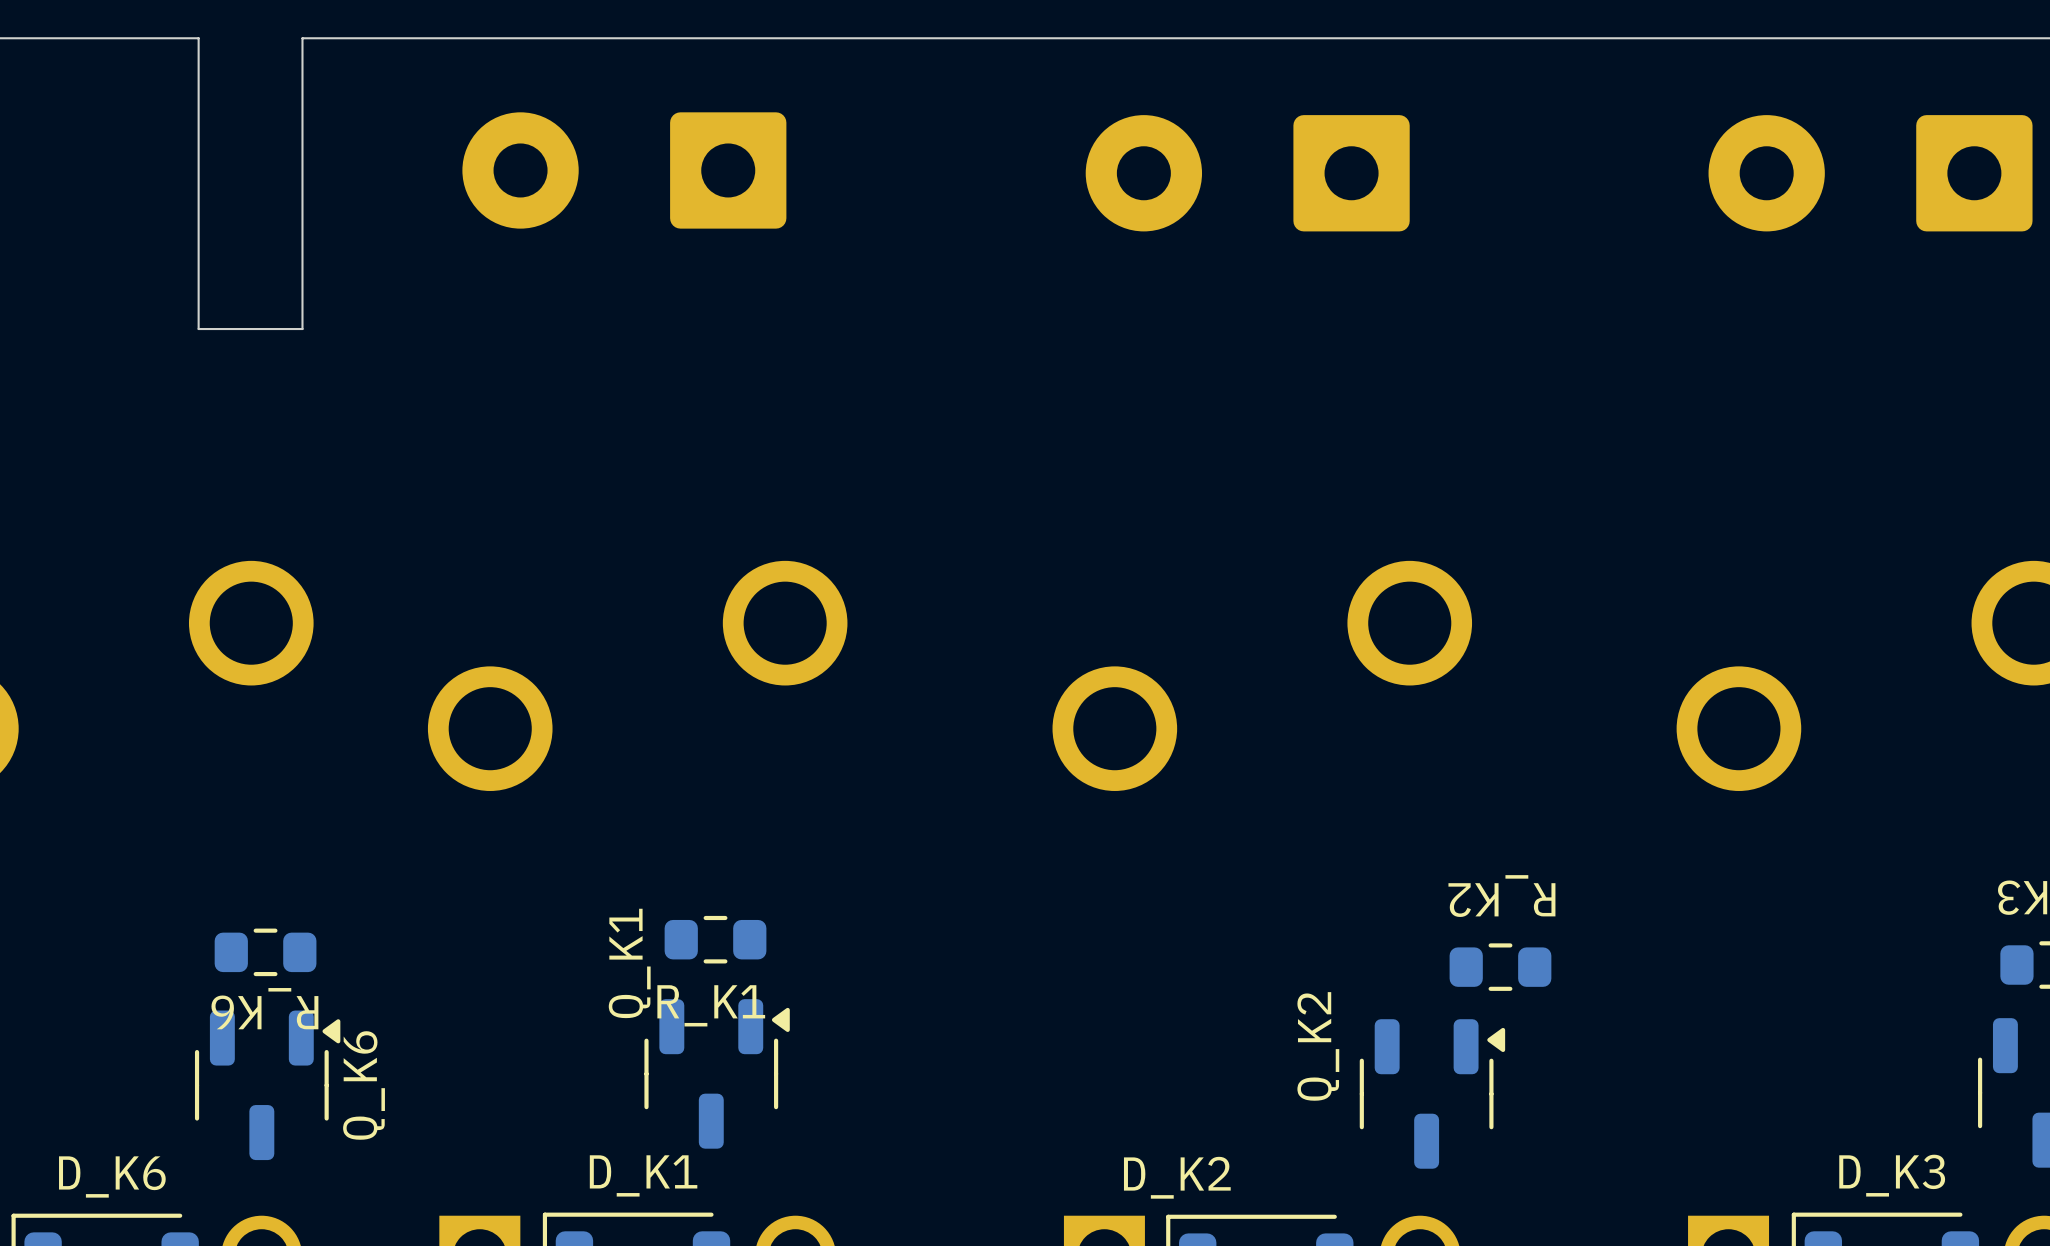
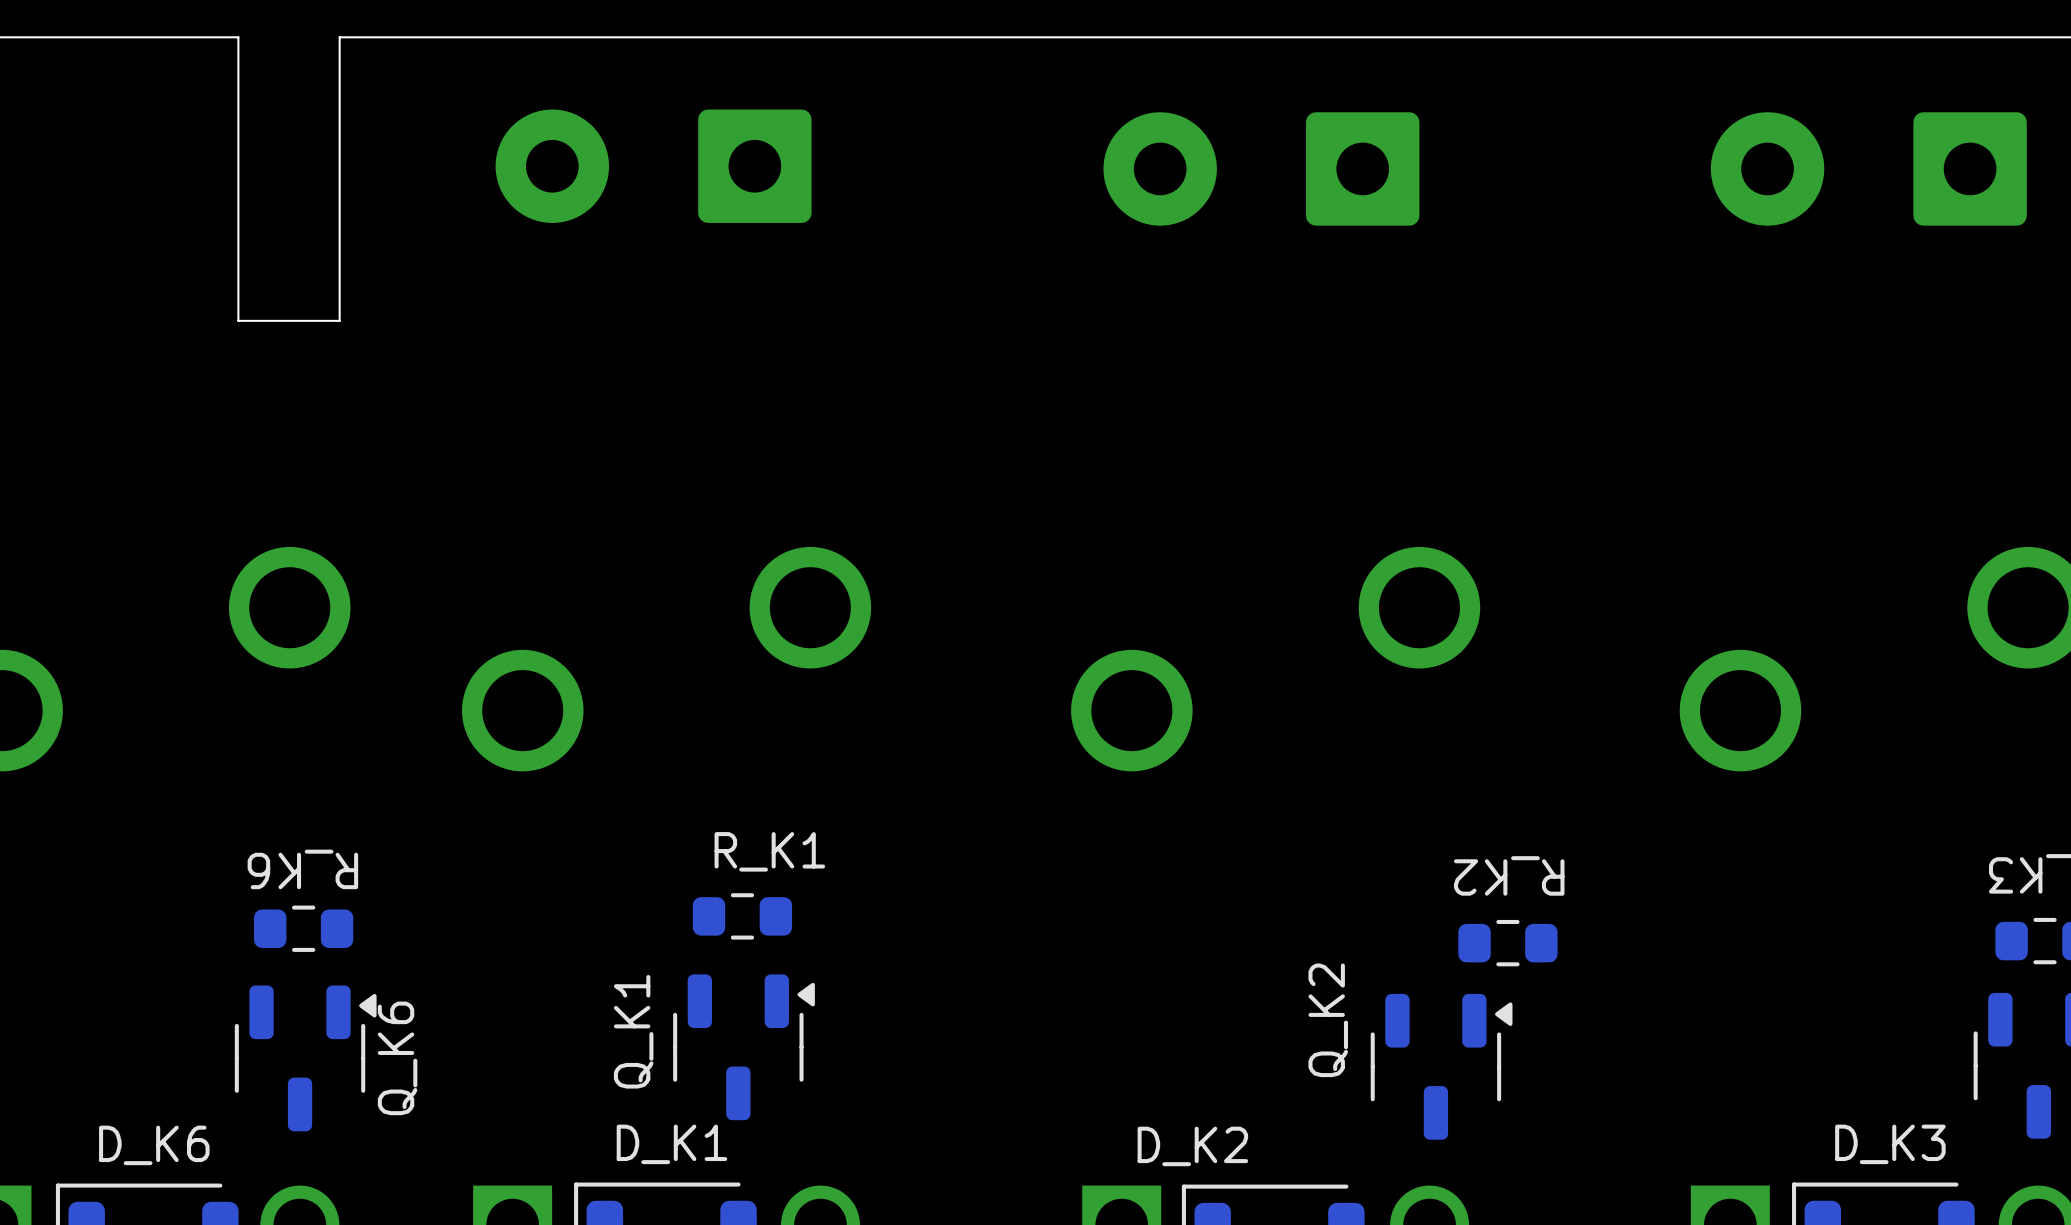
Q_K1 name position: Q_K1 (629, 963) -> Q_K1 (633, 1031)
R_K1 name position: R_K1 (711, 1005) -> R_K1 (769, 851)
R_K6 name position: R_K6 (264, 1008) -> R_K6 (302, 869)

